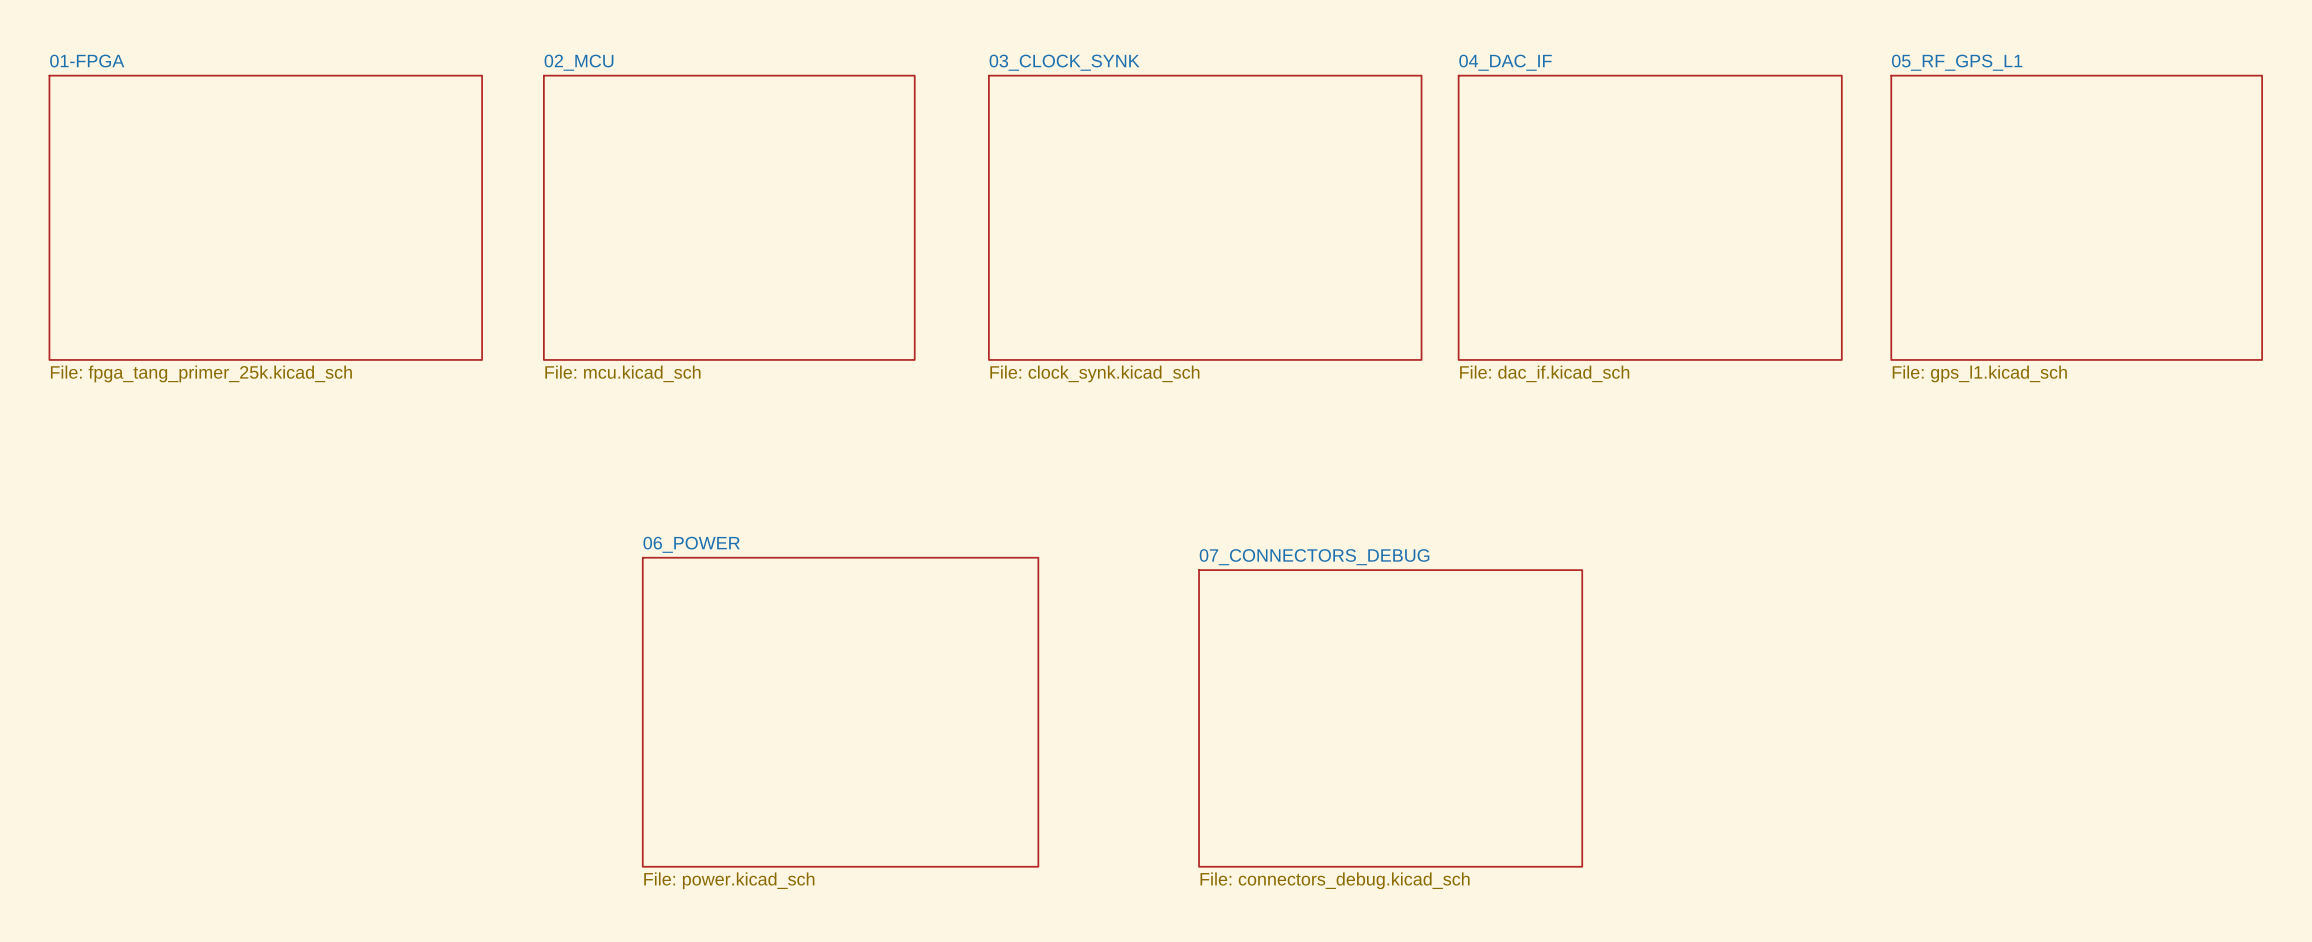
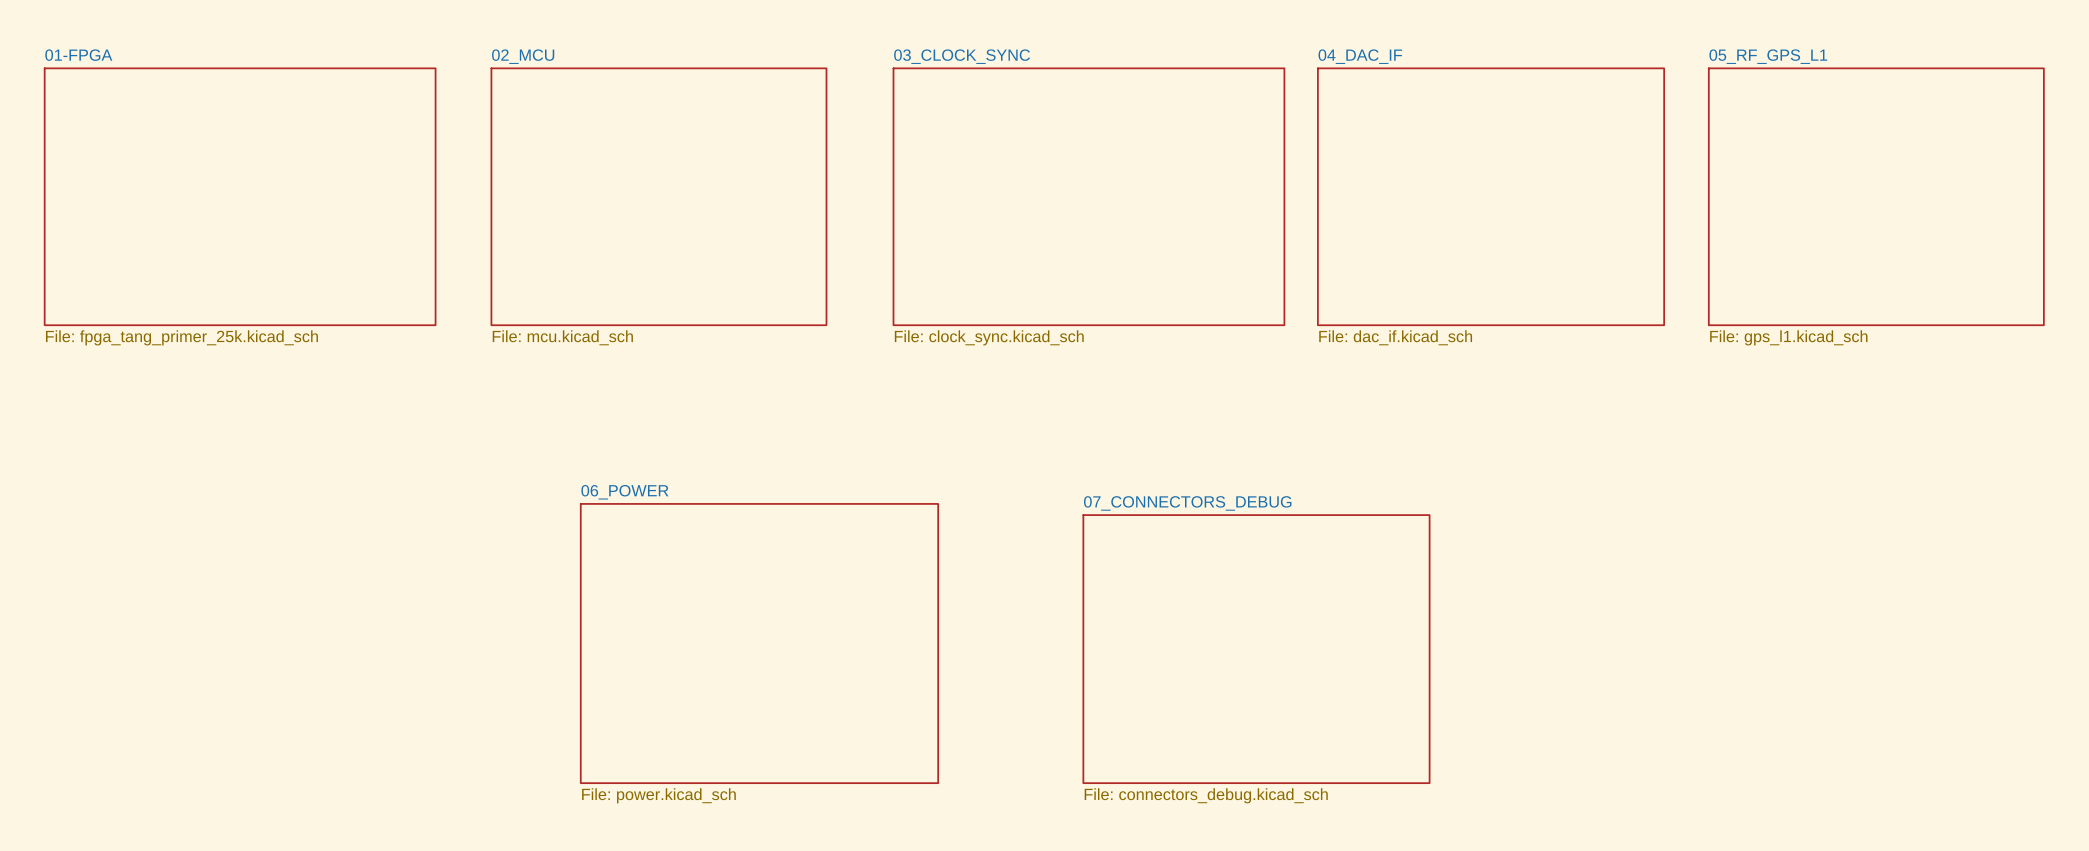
sheet 03_CLOCK_SYNK name: 03_CLOCK_SYNK (1064, 62) -> 03_CLOCK_SYNC (962, 56)
sheet 03_CLOCK_SYNK value: File: clock_synk.kicad_sch (1094, 373) -> File: clock_sync.kicad_sch (989, 337)

